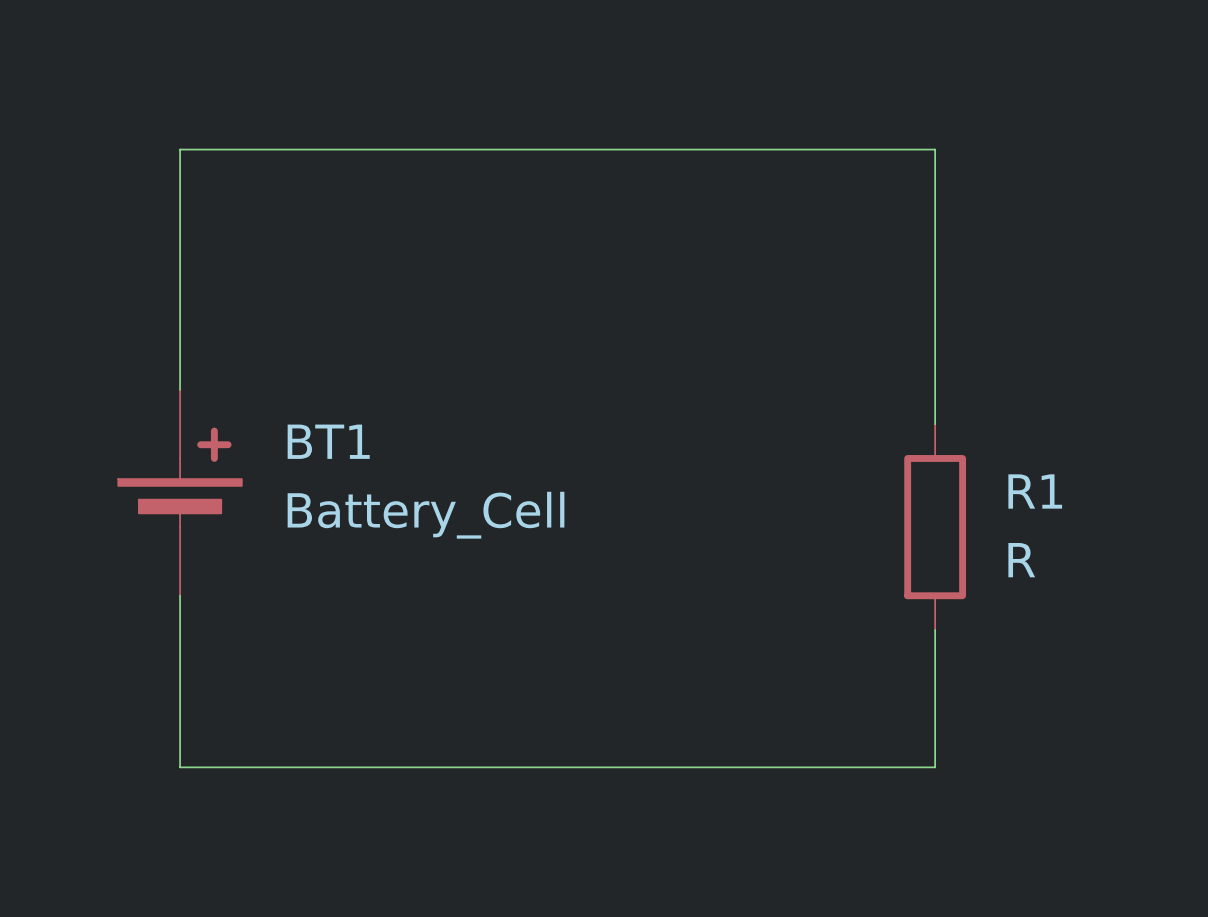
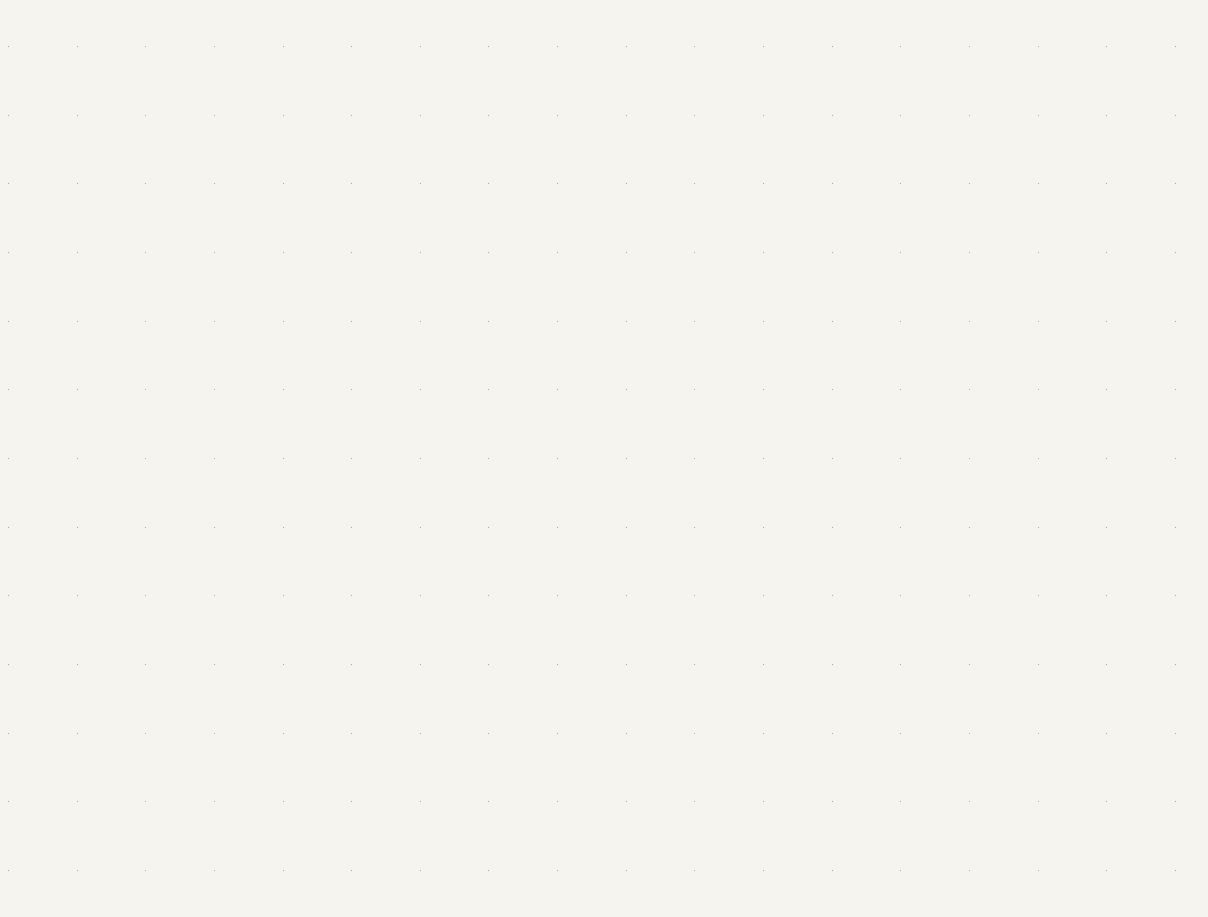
wire: (180, 389) (180, 149) (935, 149) (935, 424) -> none
BT1: Battery_Cell (180, 492) -> none
R1: R (935, 527) -> none
wire: (180, 595) (180, 767) (935, 767) (935, 630) -> none

